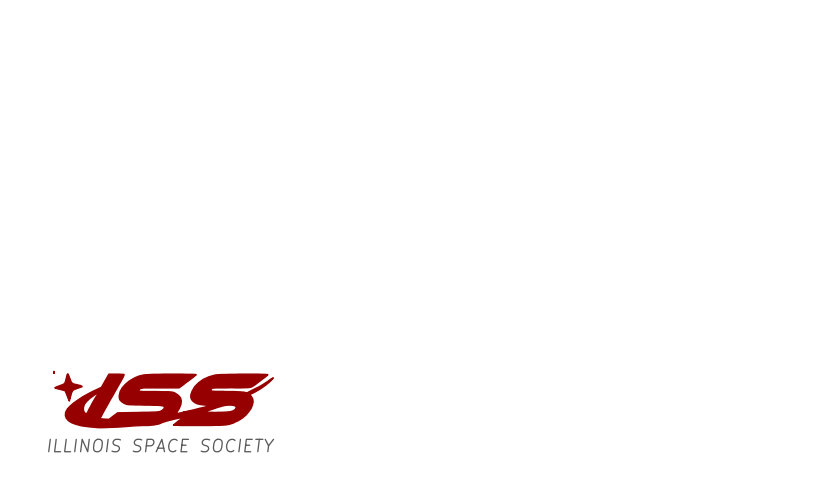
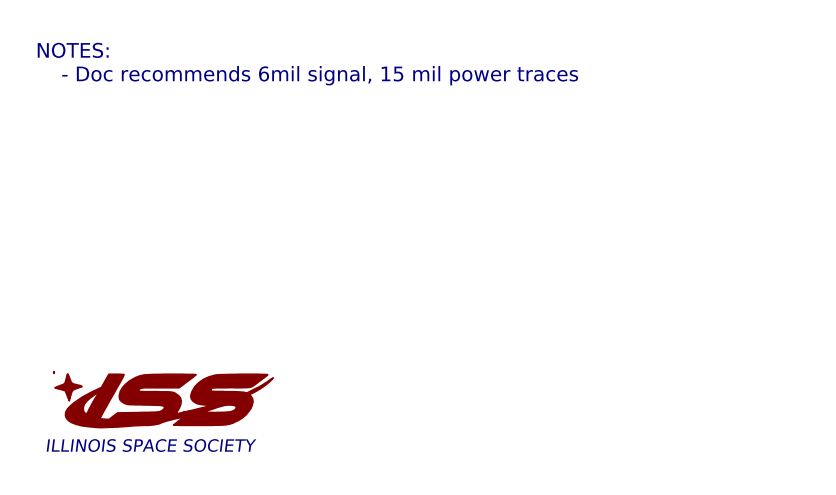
text: none -> NOTES: (73, 50)
text: none -> - Doc recommends 6mil signal, 15 mil power traces (320, 75)

